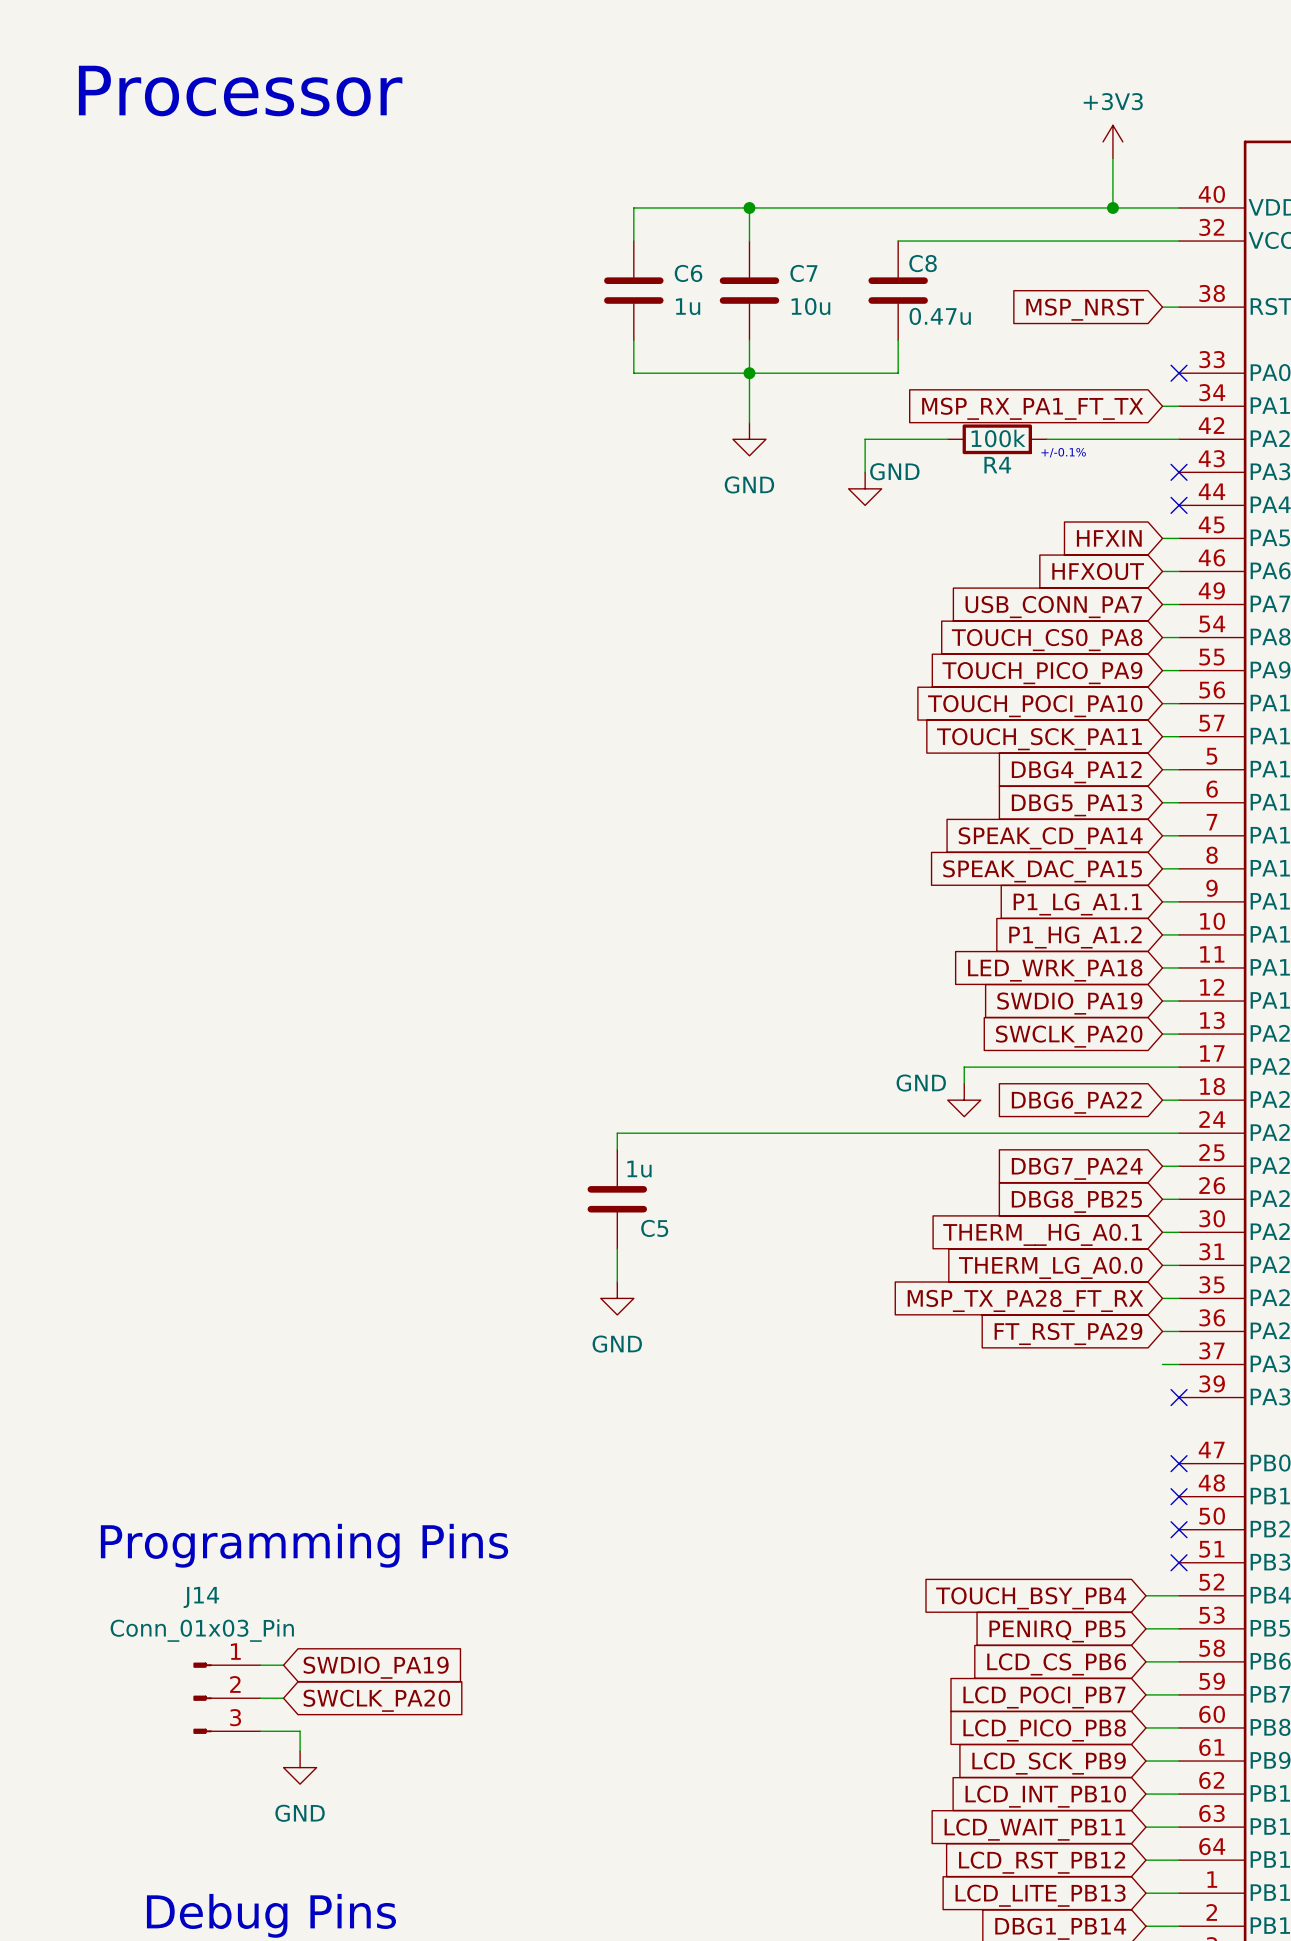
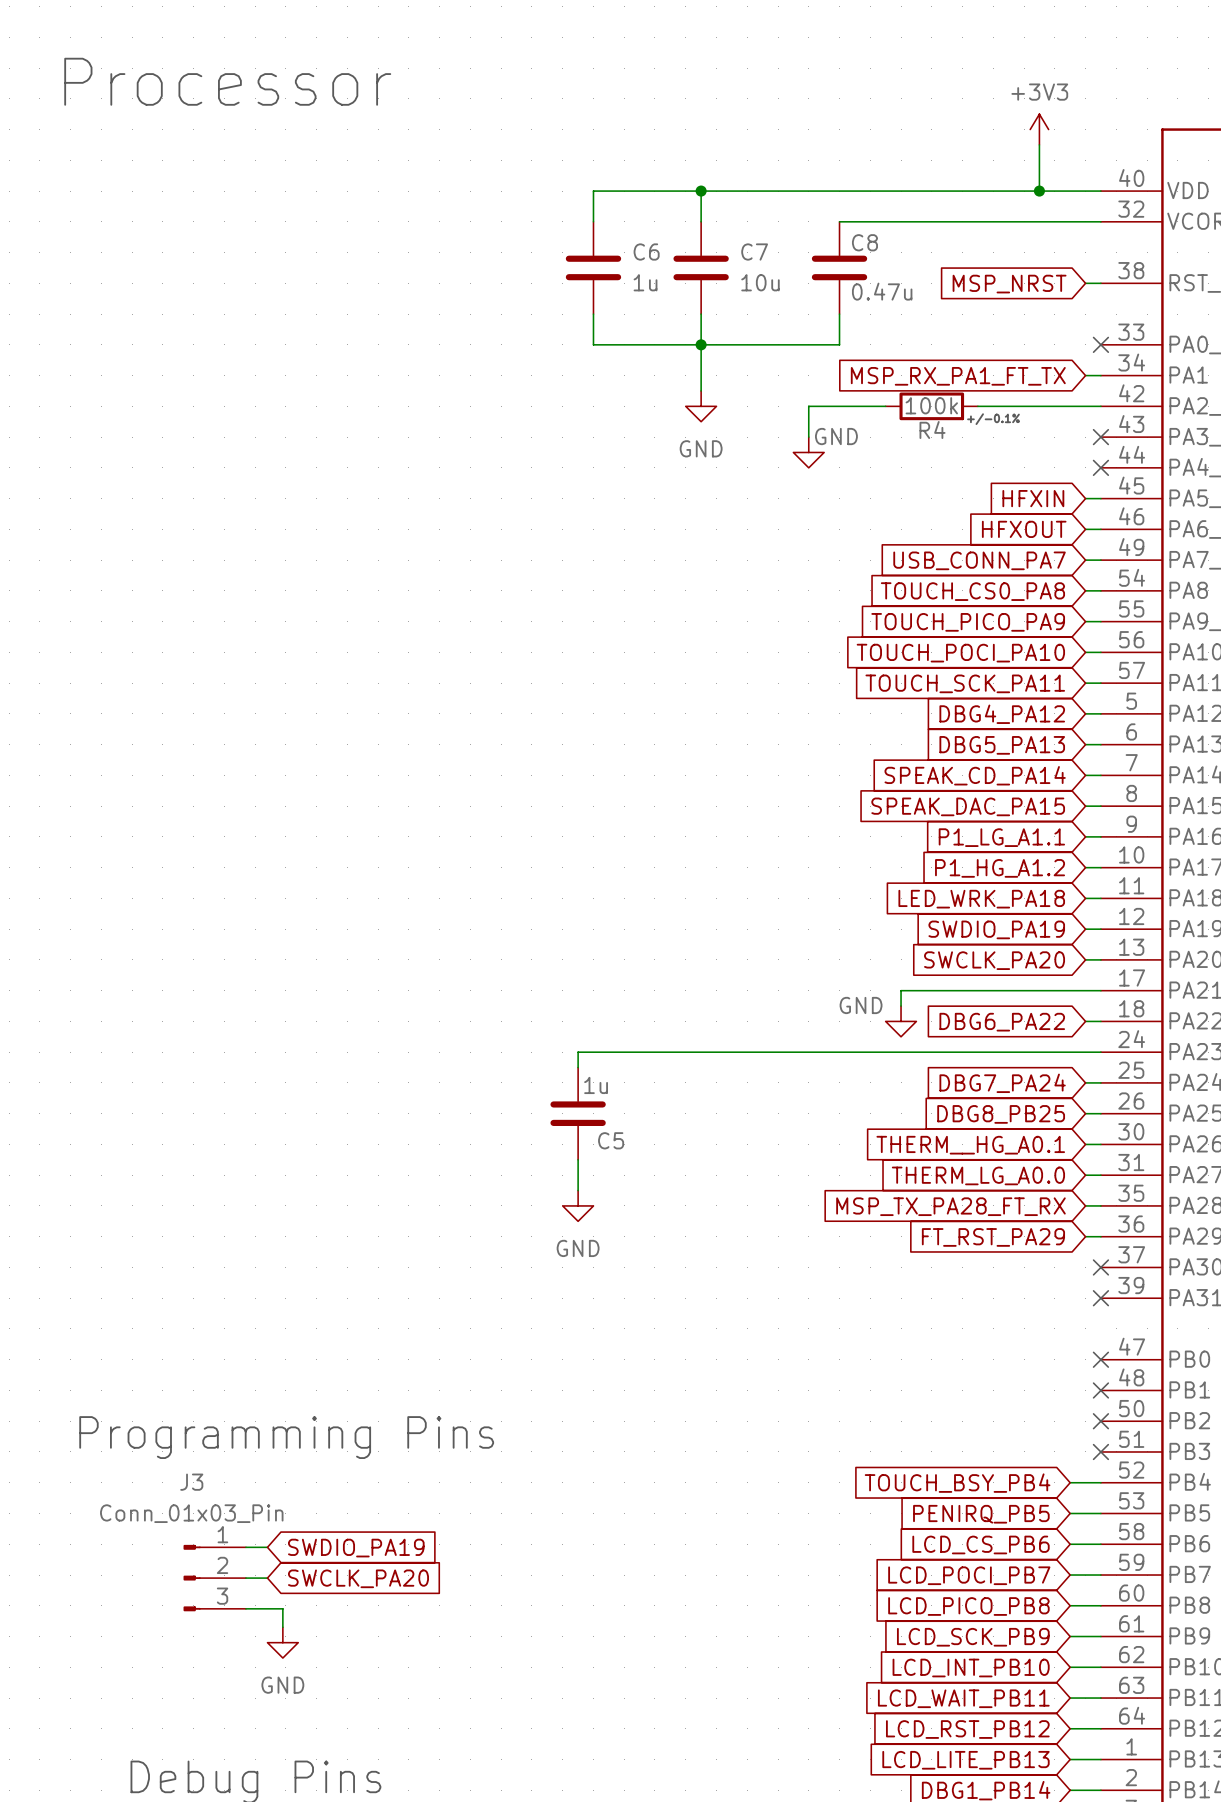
wire: (1162, 1364) (1179, 1364) -> none
no-connect mark: none -> (1100, 1267)
J14 name: J14 (201, 1597) -> J3 (191, 1482)

